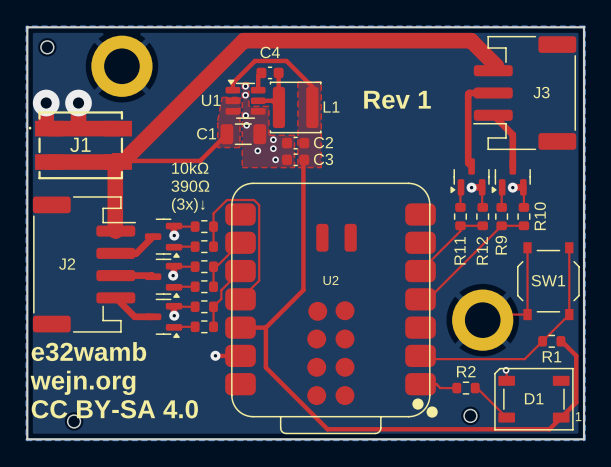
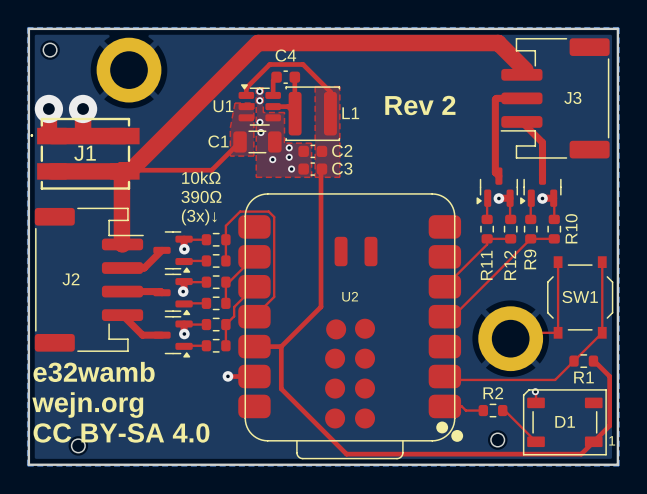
text: Rev 1 (397, 99) -> Rev 2 (420, 105)

